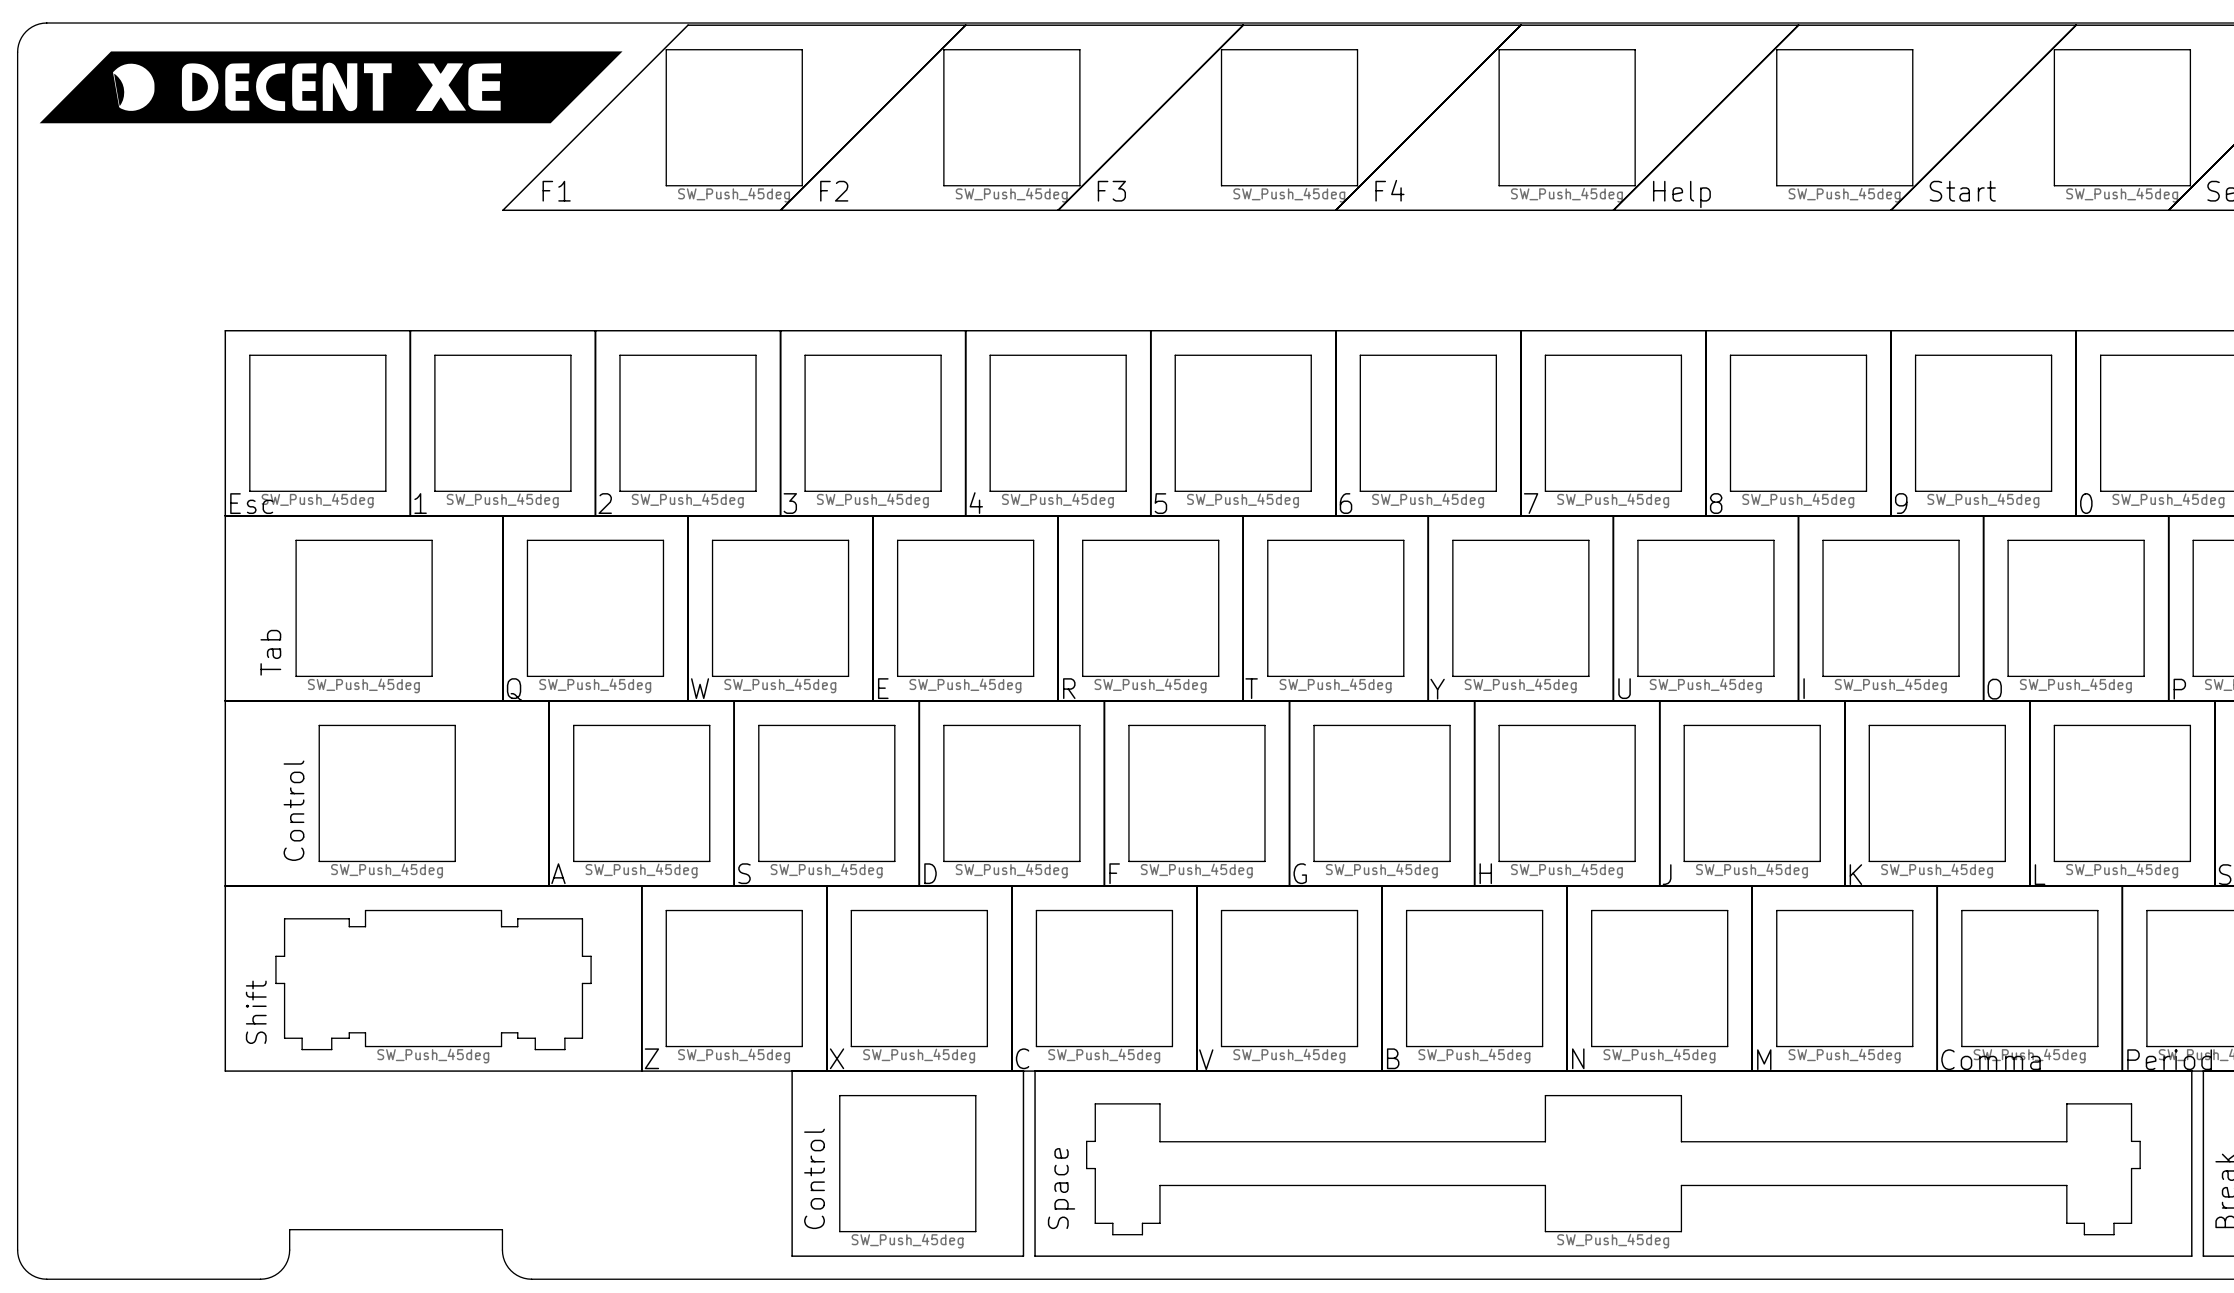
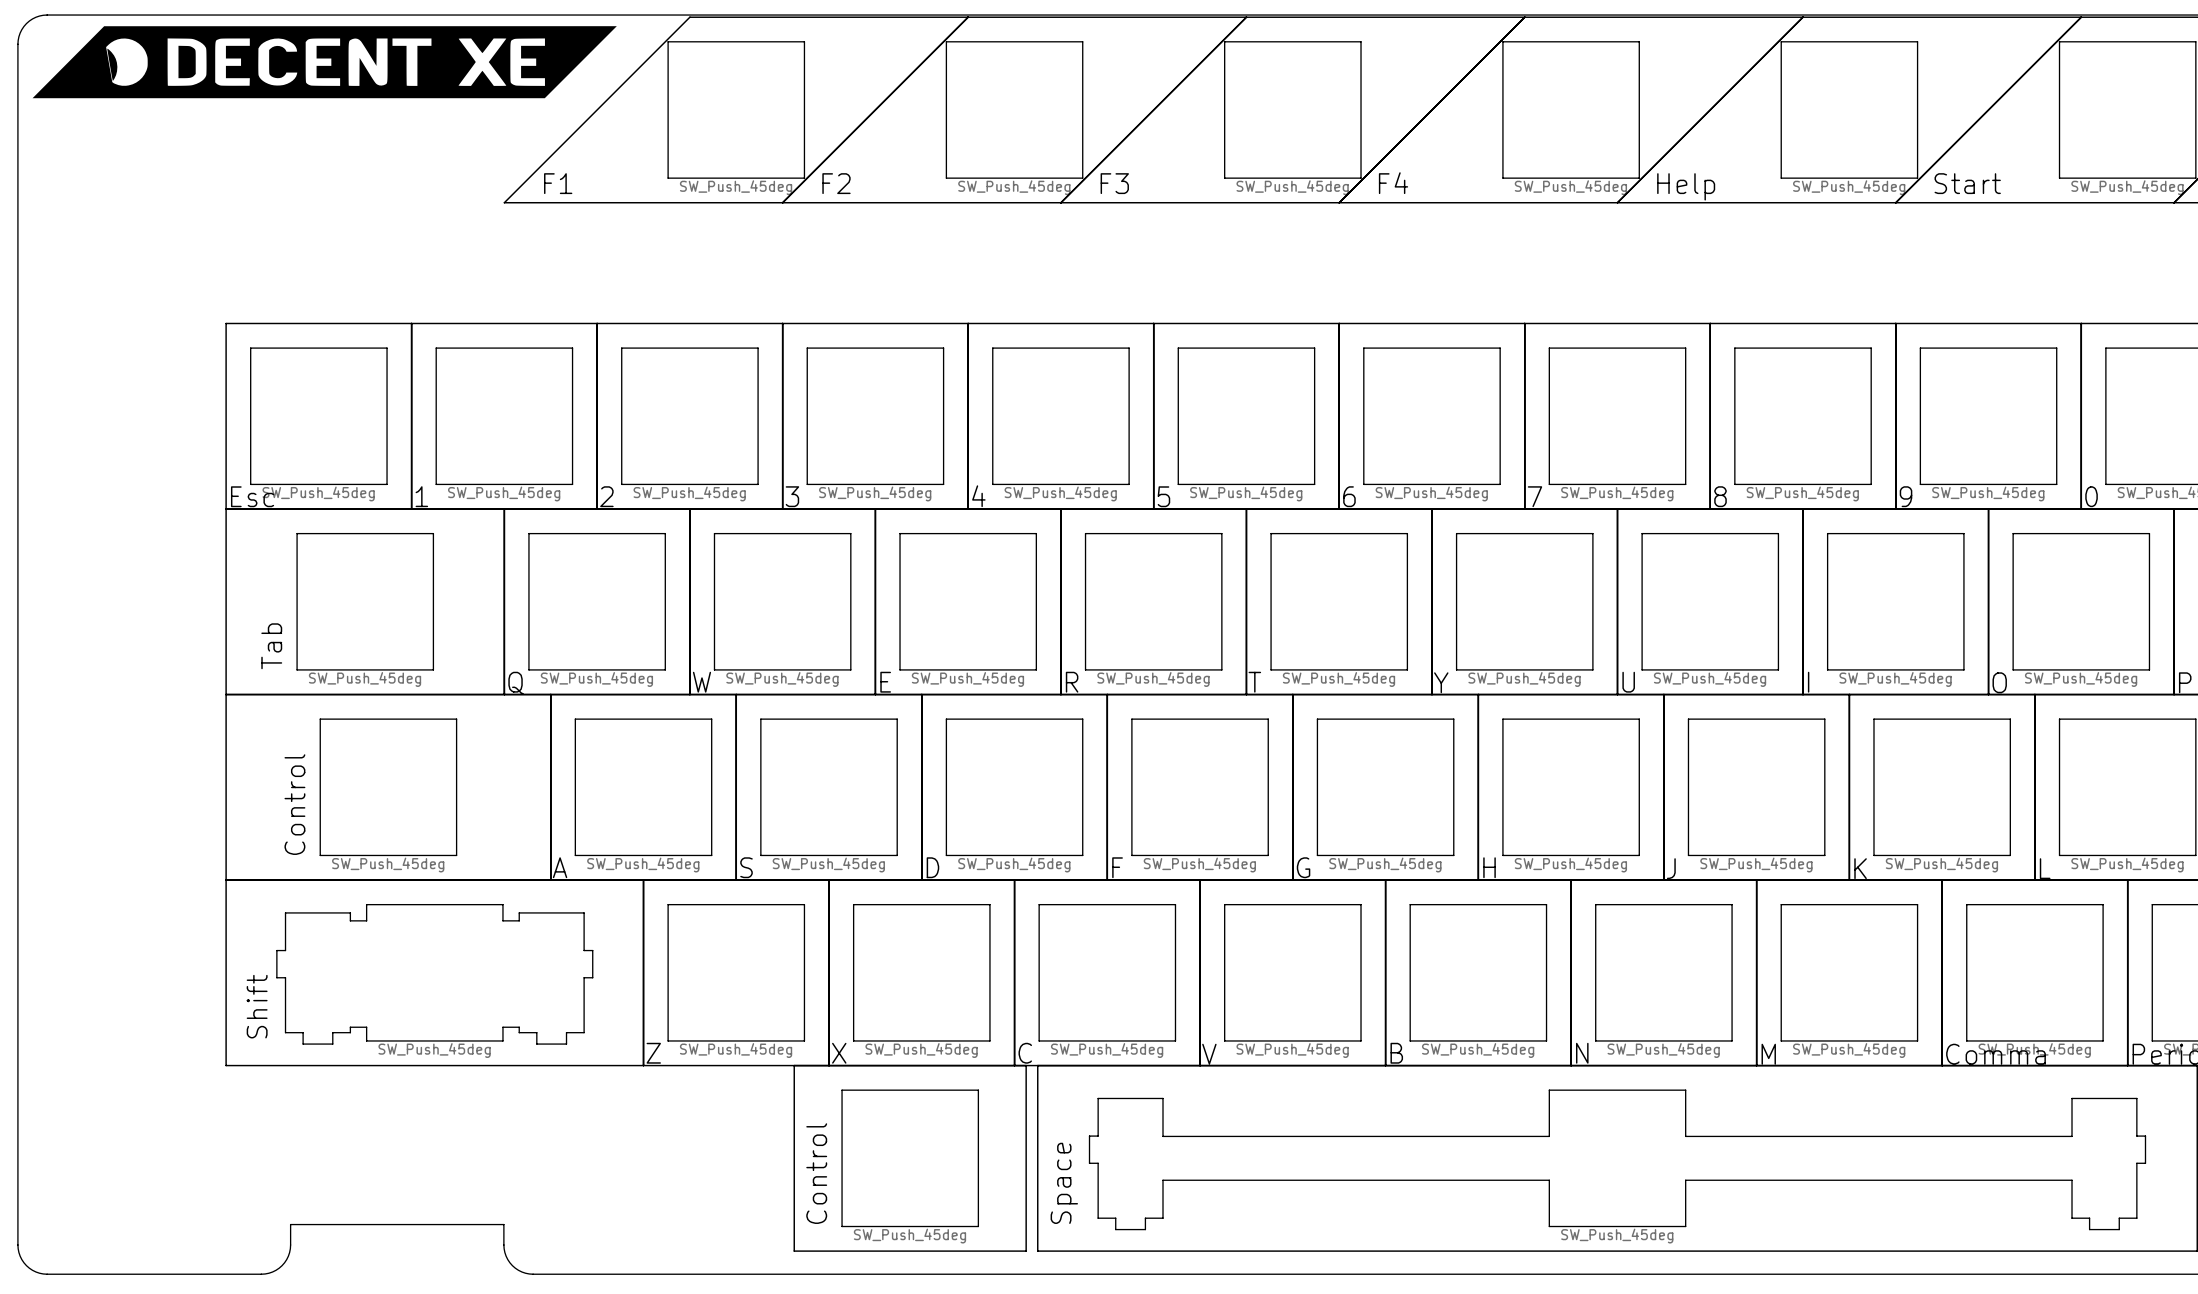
drawing: none -> [32, 26, 617, 99]
drawing: [39, 51, 623, 124] -> none

